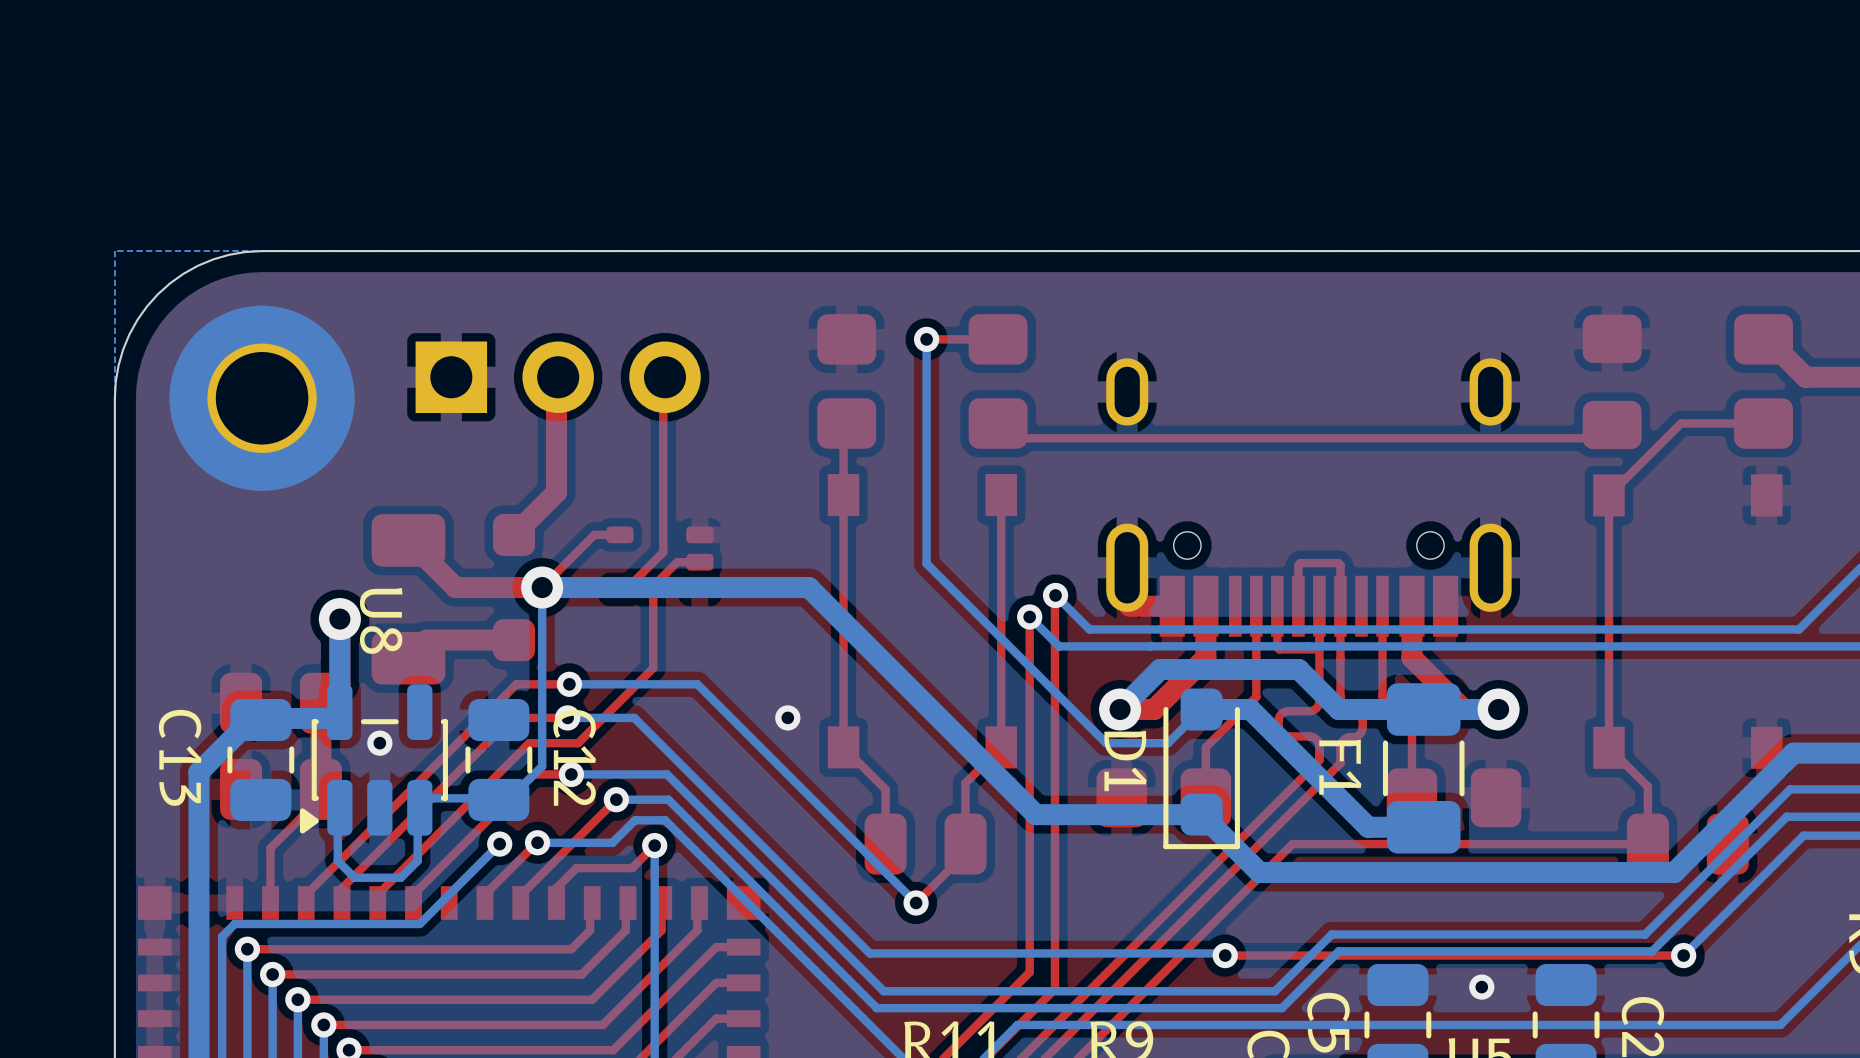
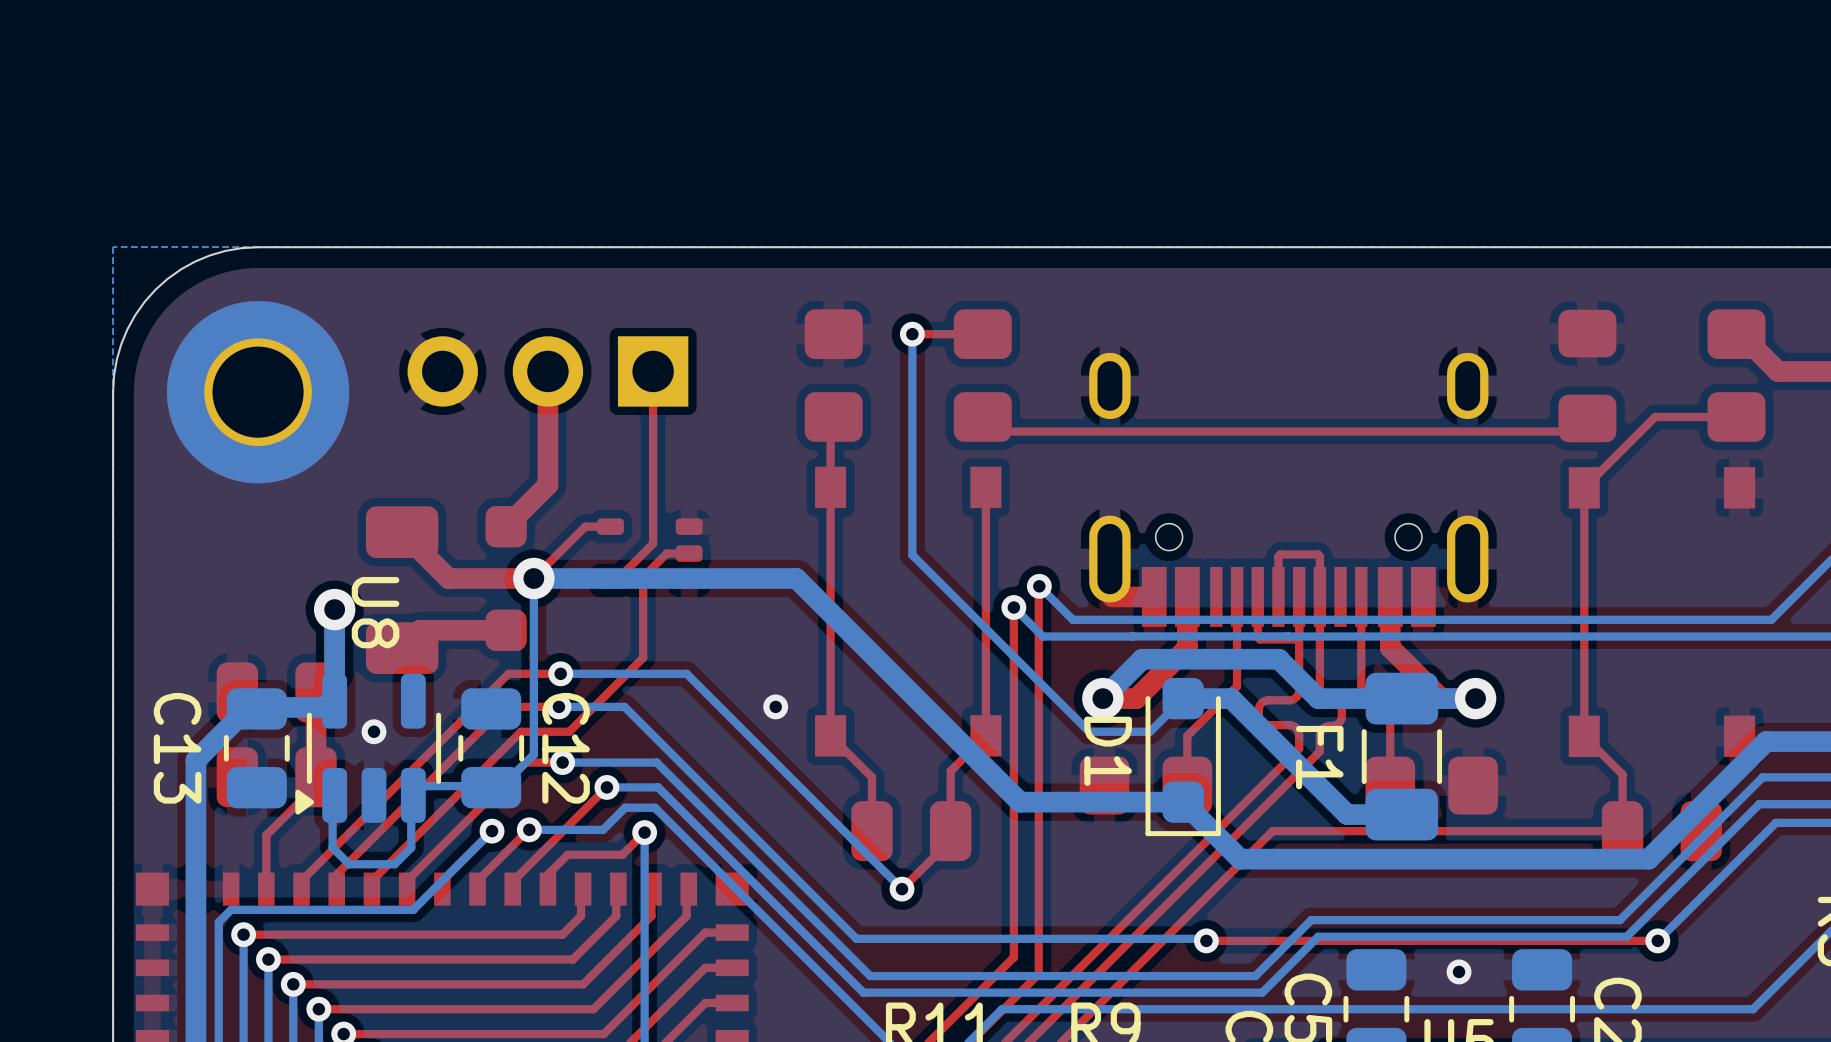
part rotation: 0° (558, 377) -> 180° (547, 371)
U8 footprint: [299, 684, 448, 836] -> [295, 673, 442, 823]

